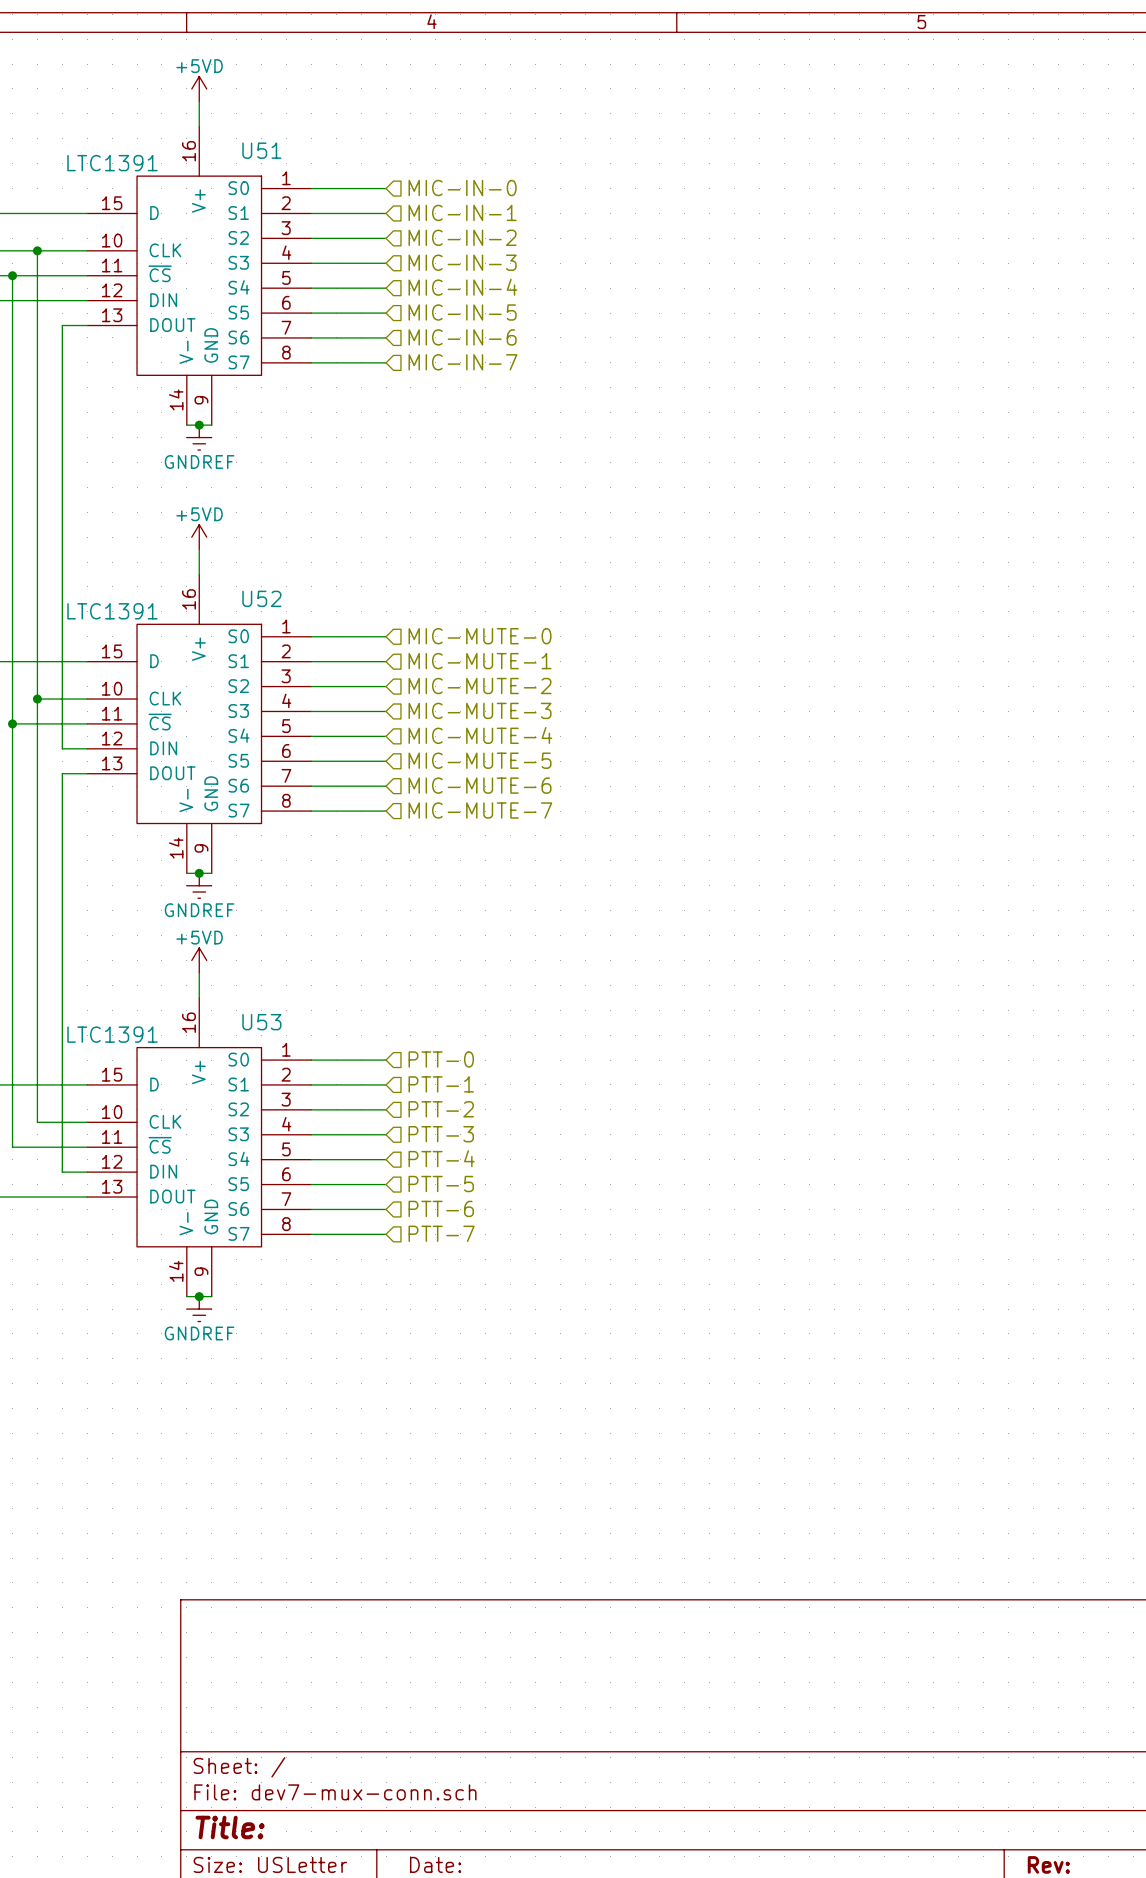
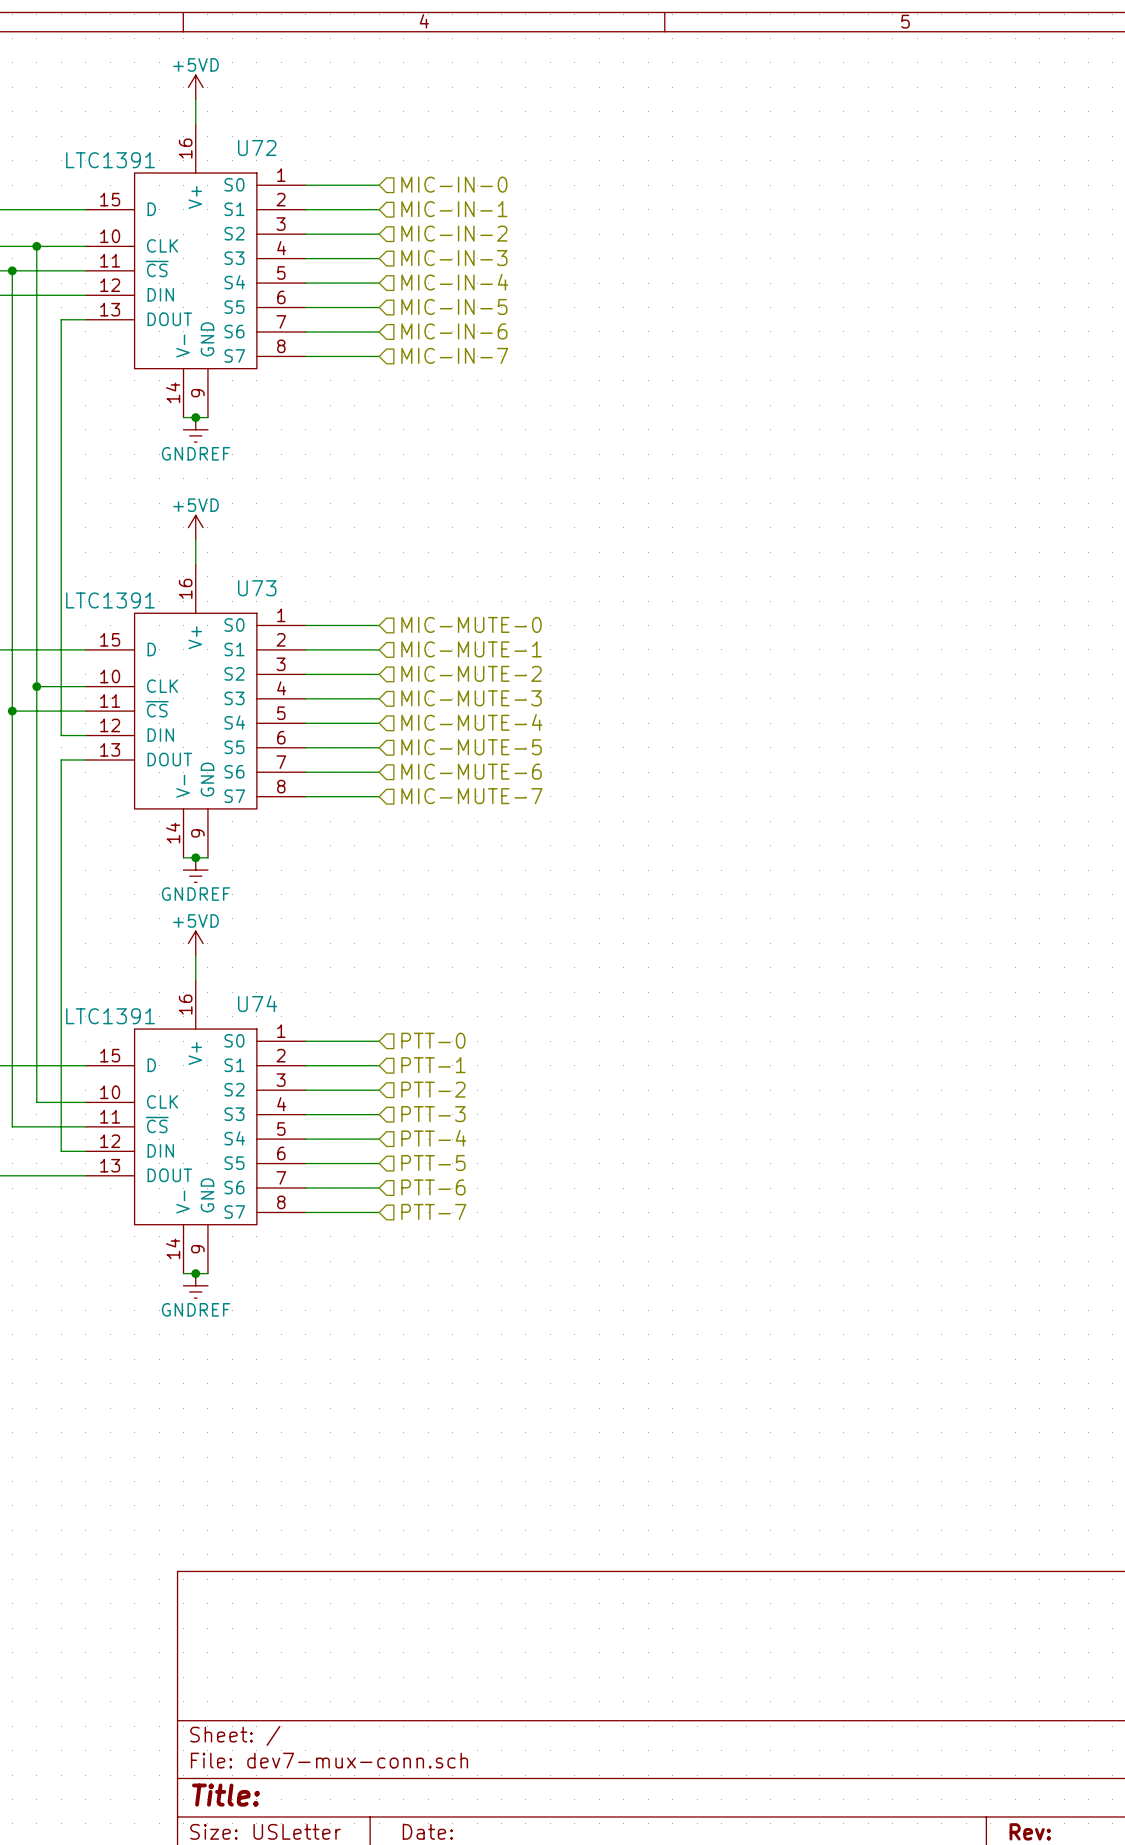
U51 name: U51 (261, 150) -> U72 (257, 147)
U52 name: U52 (261, 598) -> U73 (257, 588)
U53 name: U53 (261, 1022) -> U74 (257, 1003)

